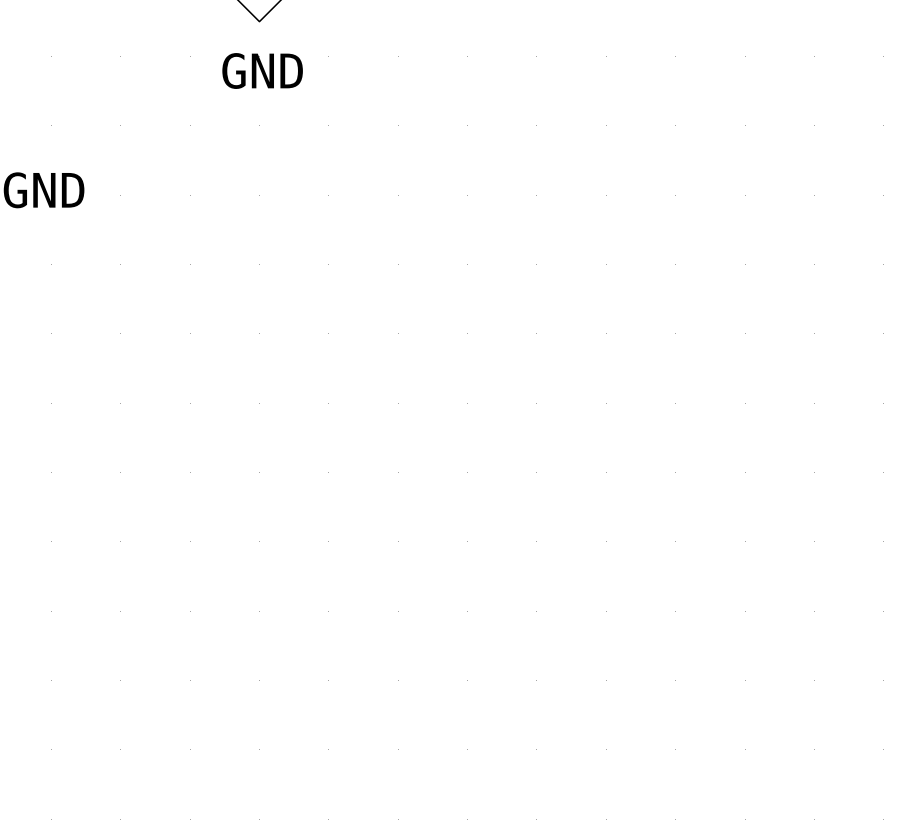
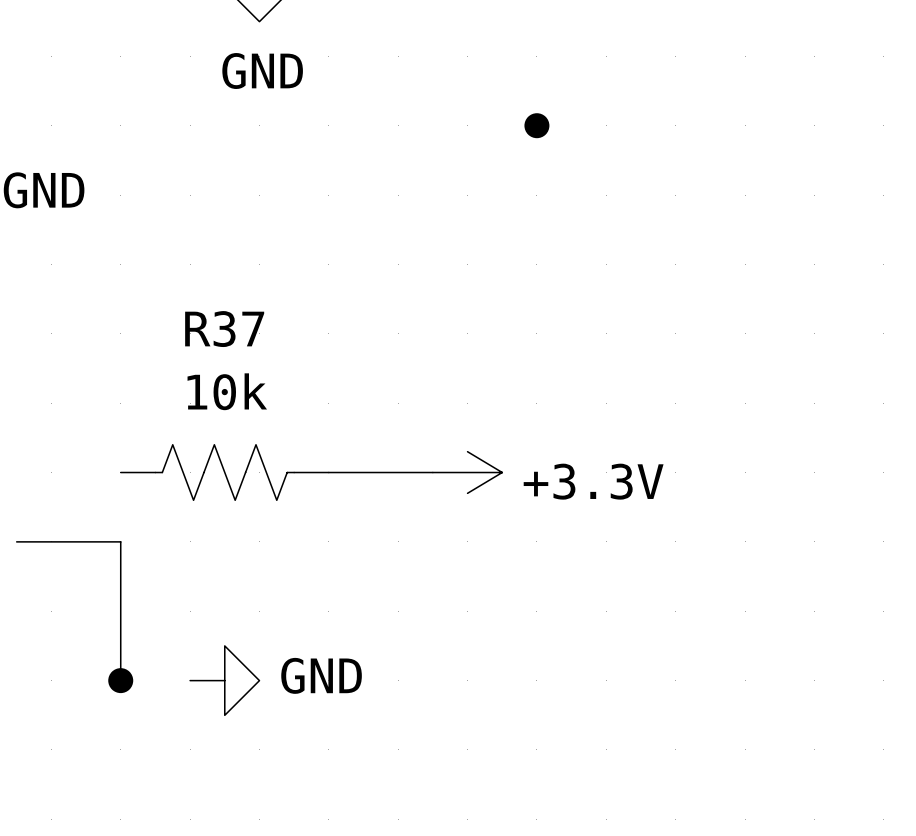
junction: none -> (536, 125)
R37: none -> 10k (224, 472)
wire: none -> (328, 472) (432, 472)
power symbol: none -> +3.3V (467, 472)
wire: none -> (16, 541) (120, 541) (120, 680)
junction: none -> (120, 680)
power symbol: none -> GND (224, 680)

